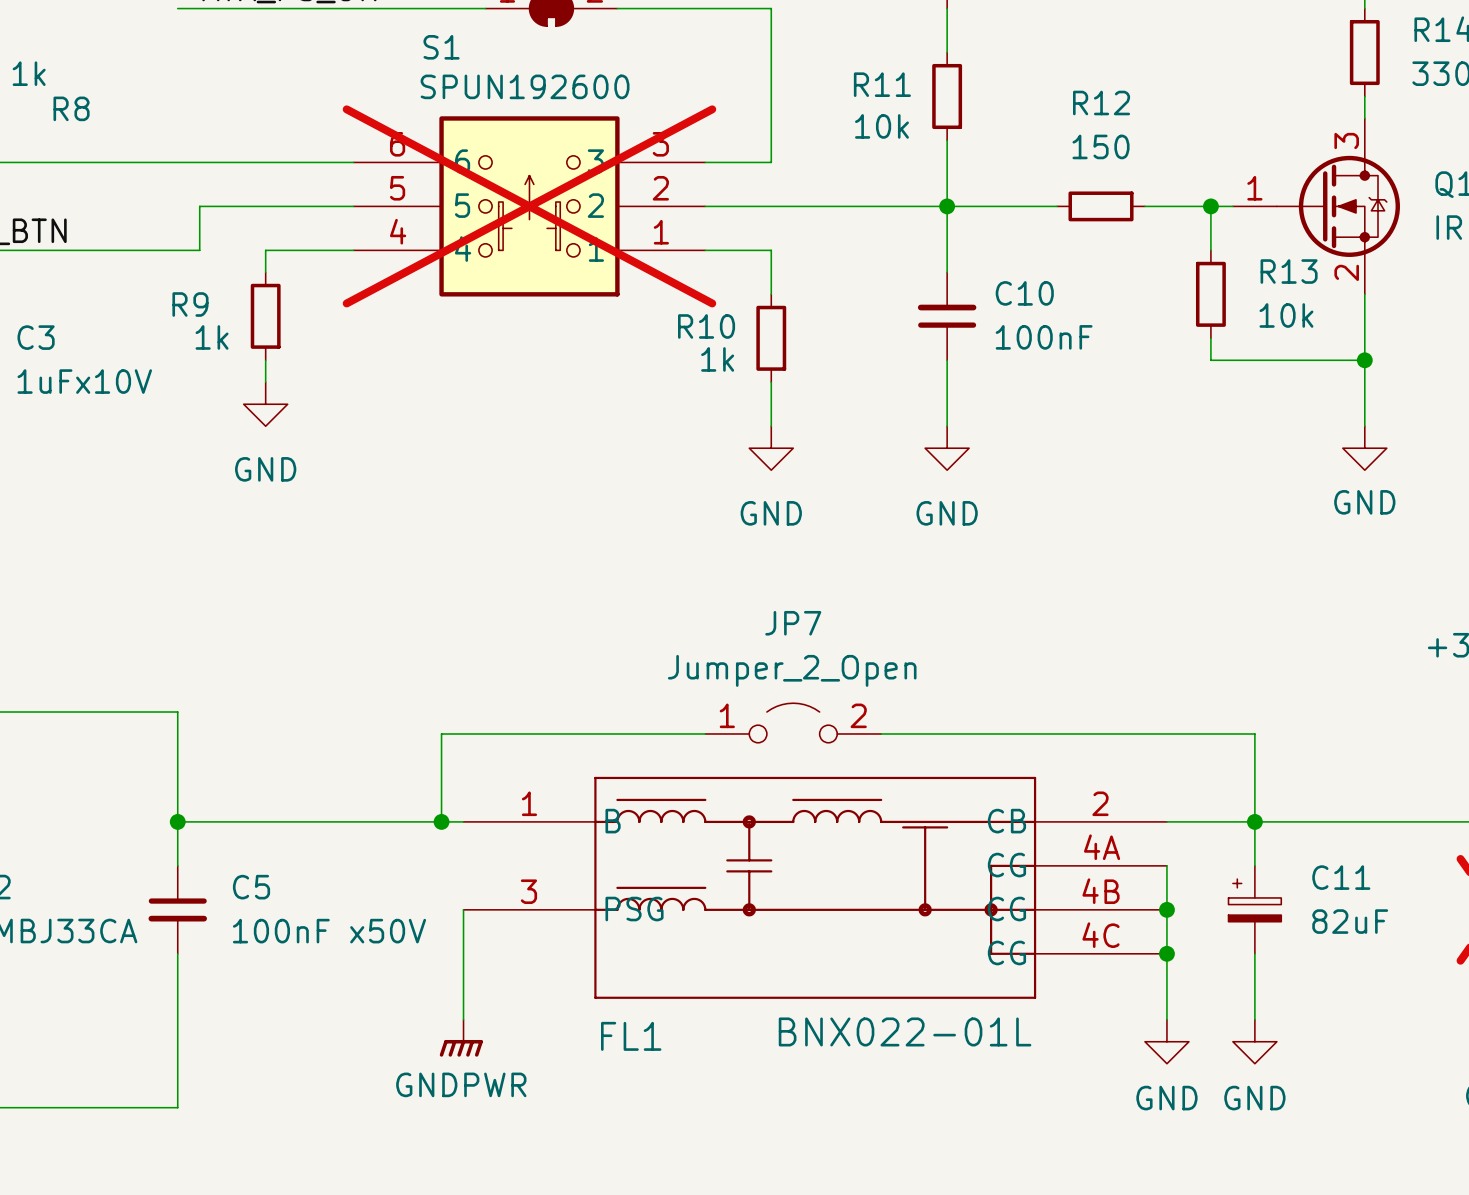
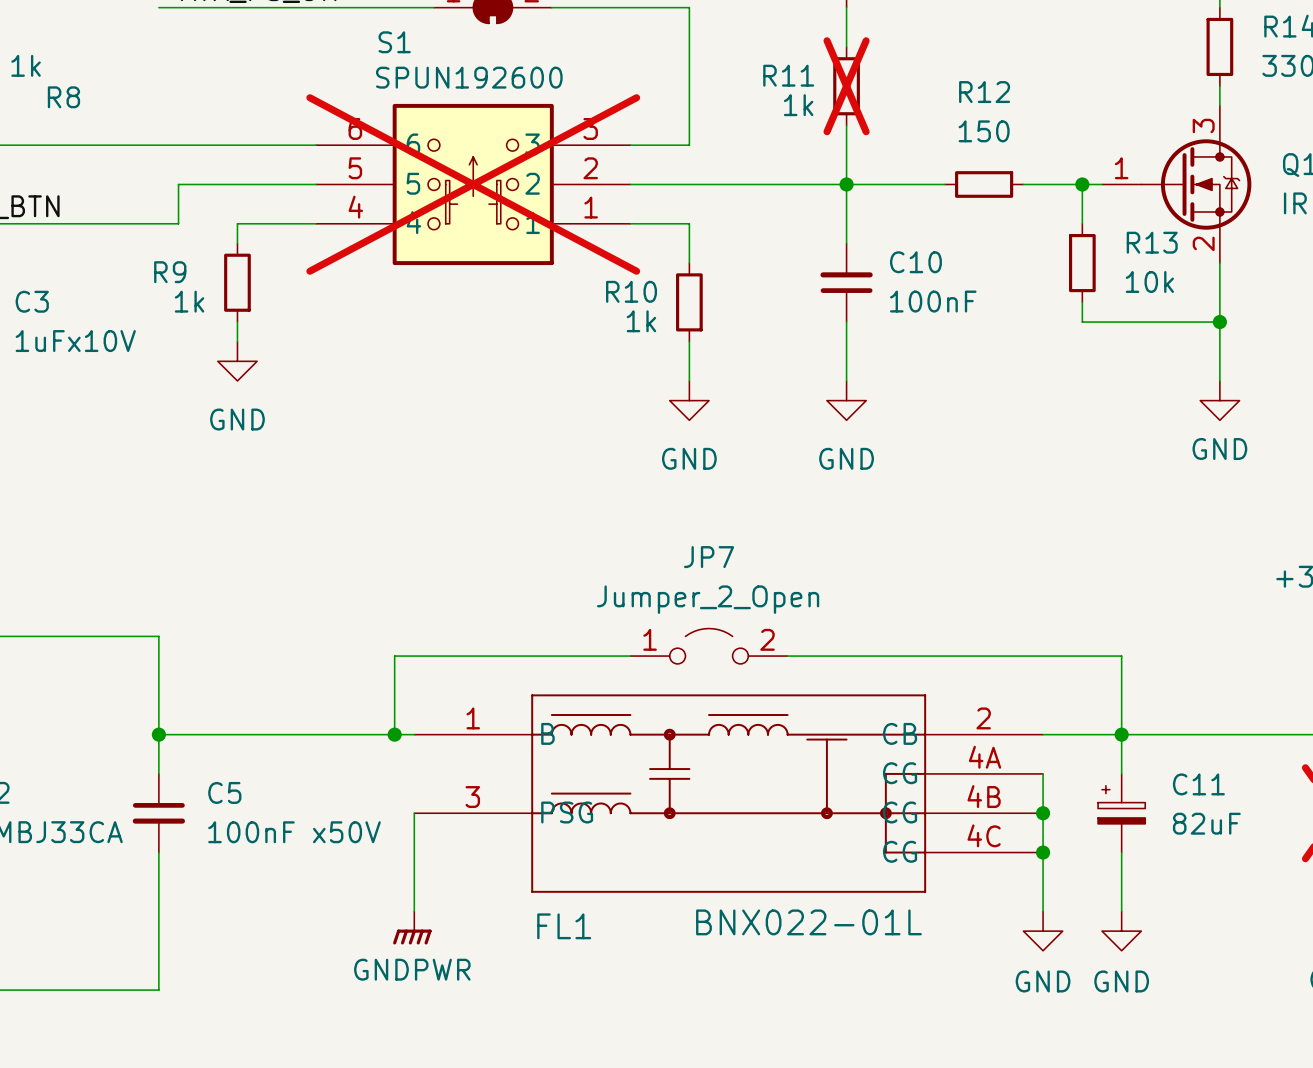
R11 do-not-place cross: none -> (846, 86)
R11 value: 10k (881, 126) -> 1k (798, 105)

